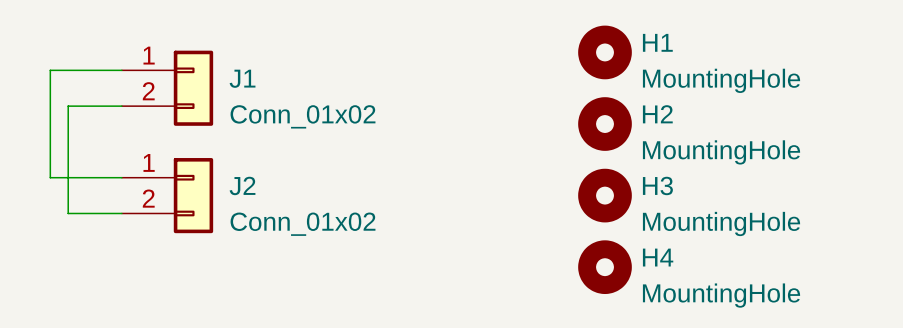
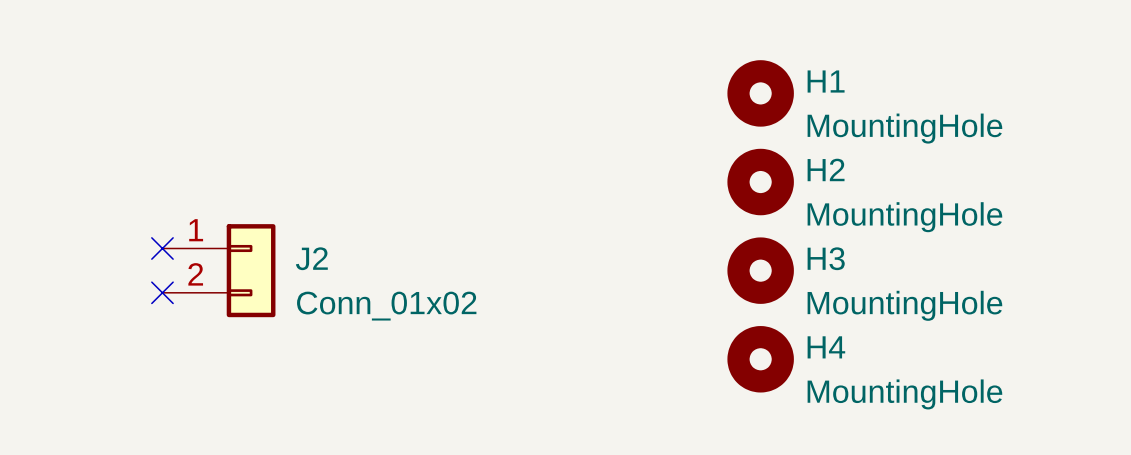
wire: (121, 70) (50, 70) (50, 177) (121, 177) -> none
J1: Conn_01x02 (167, 88) -> none
wire: (121, 106) (68, 106) (68, 213) (121, 213) -> none
no-connect mark: none -> (162, 248)
no-connect mark: none -> (162, 292)

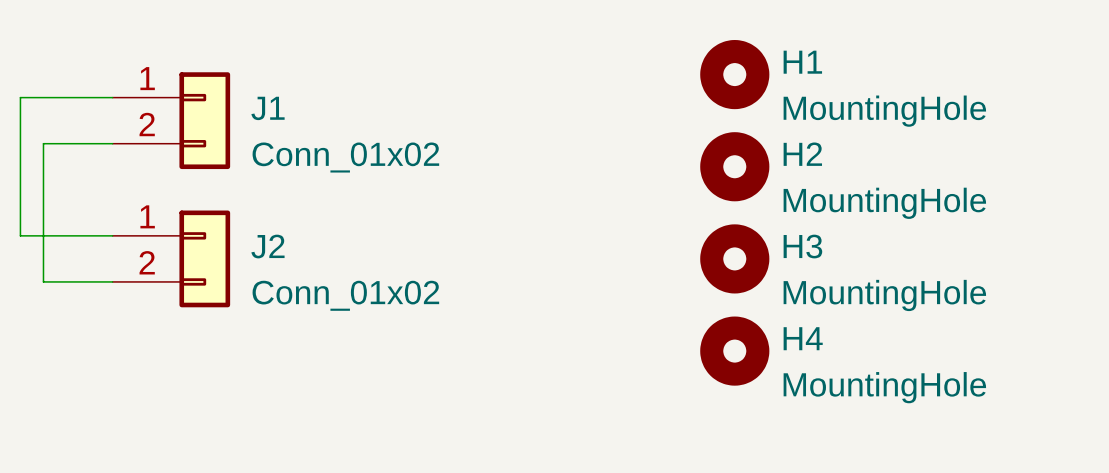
wire: none -> (112, 97) (20, 97) (20, 235) (112, 235)
J1: none -> Conn_01x02 (171, 120)
wire: none -> (112, 143) (43, 143) (43, 281) (112, 281)
no-connect mark: (162, 248) -> none
no-connect mark: (162, 292) -> none

